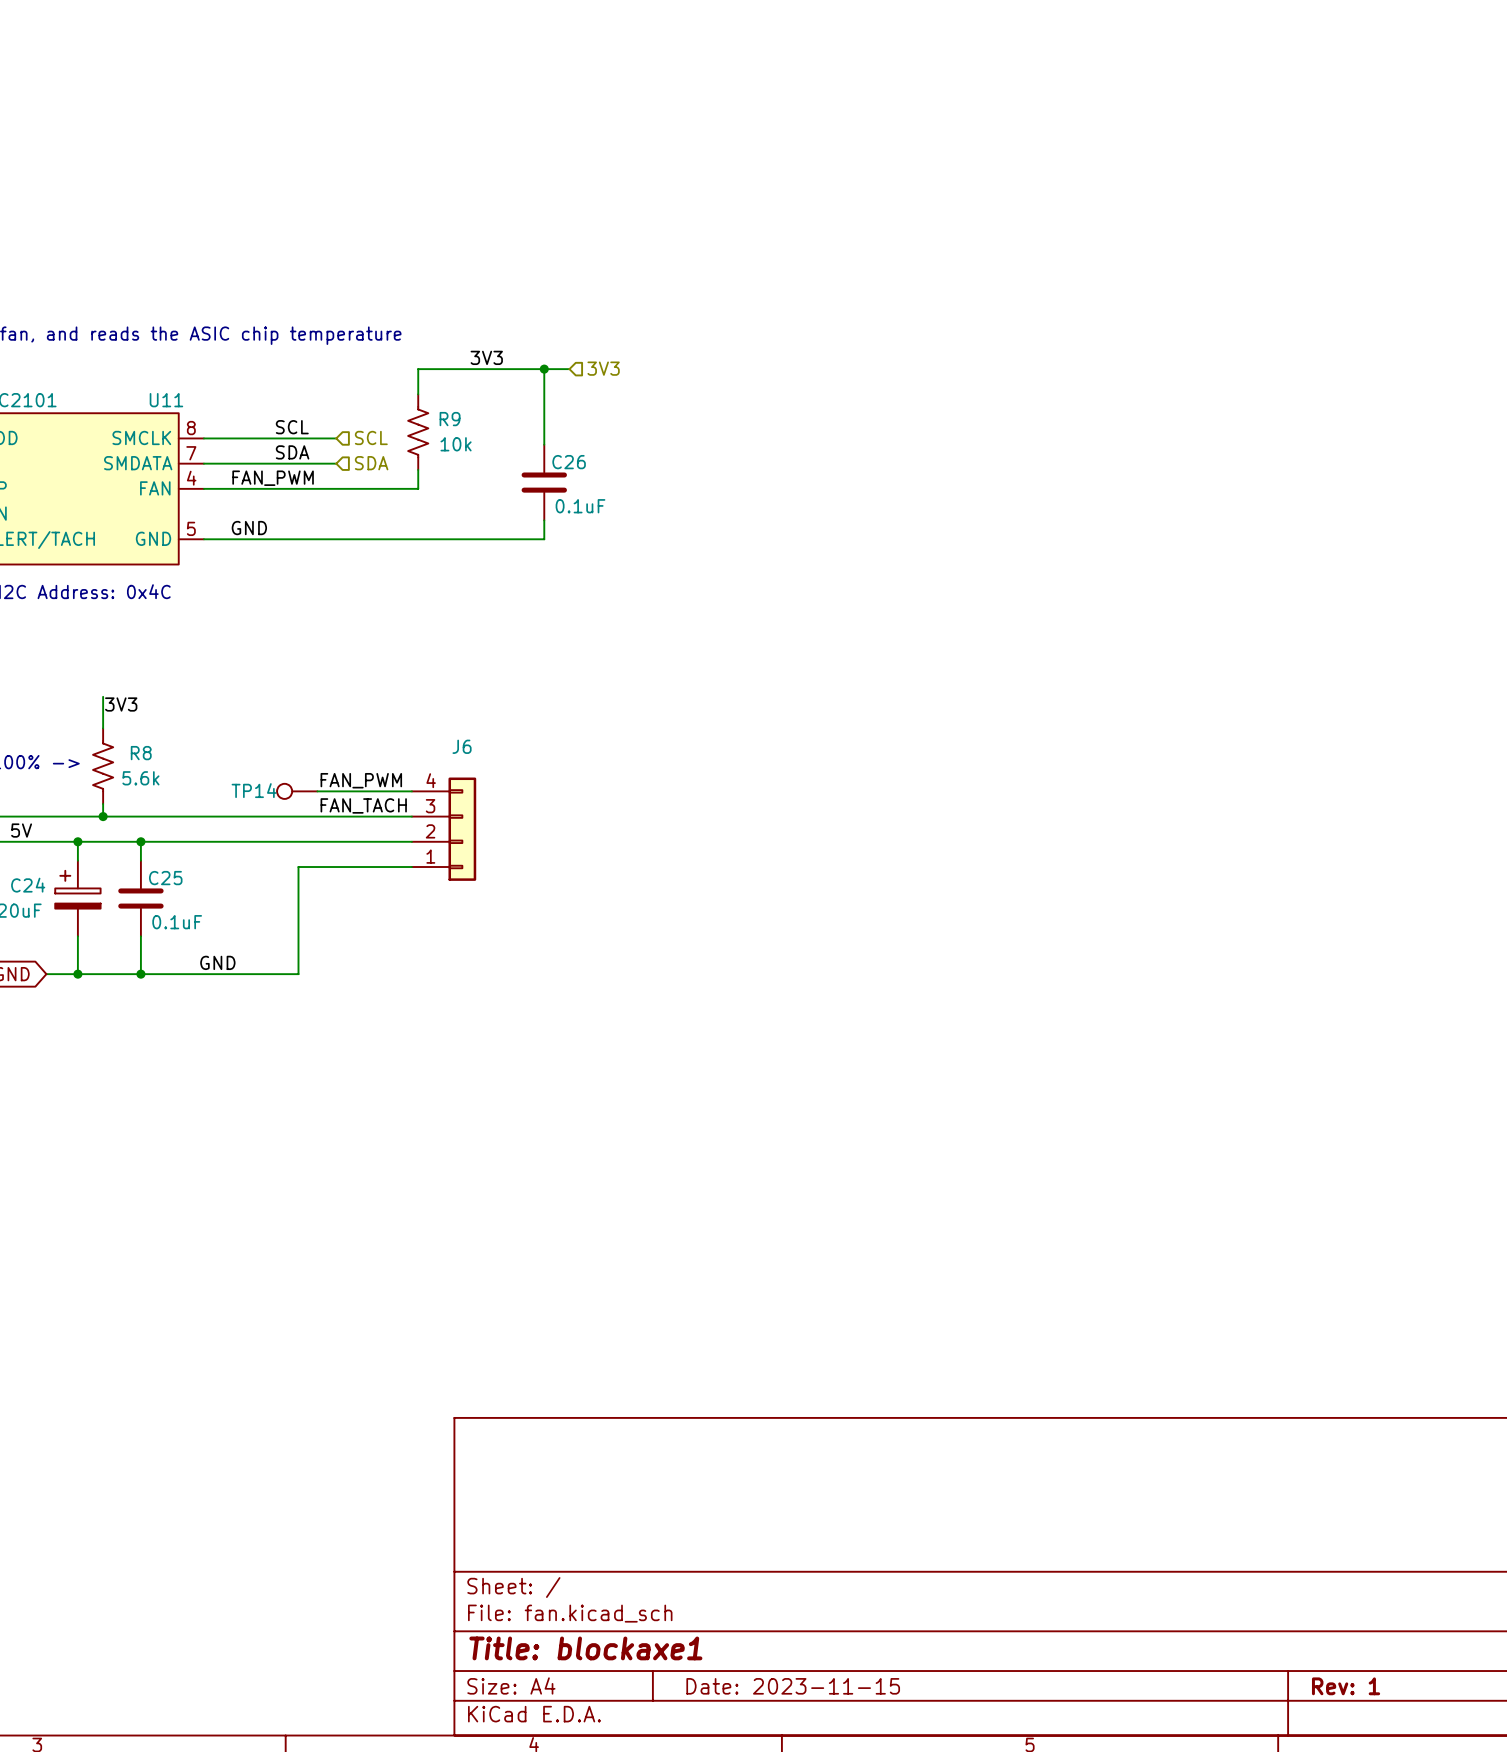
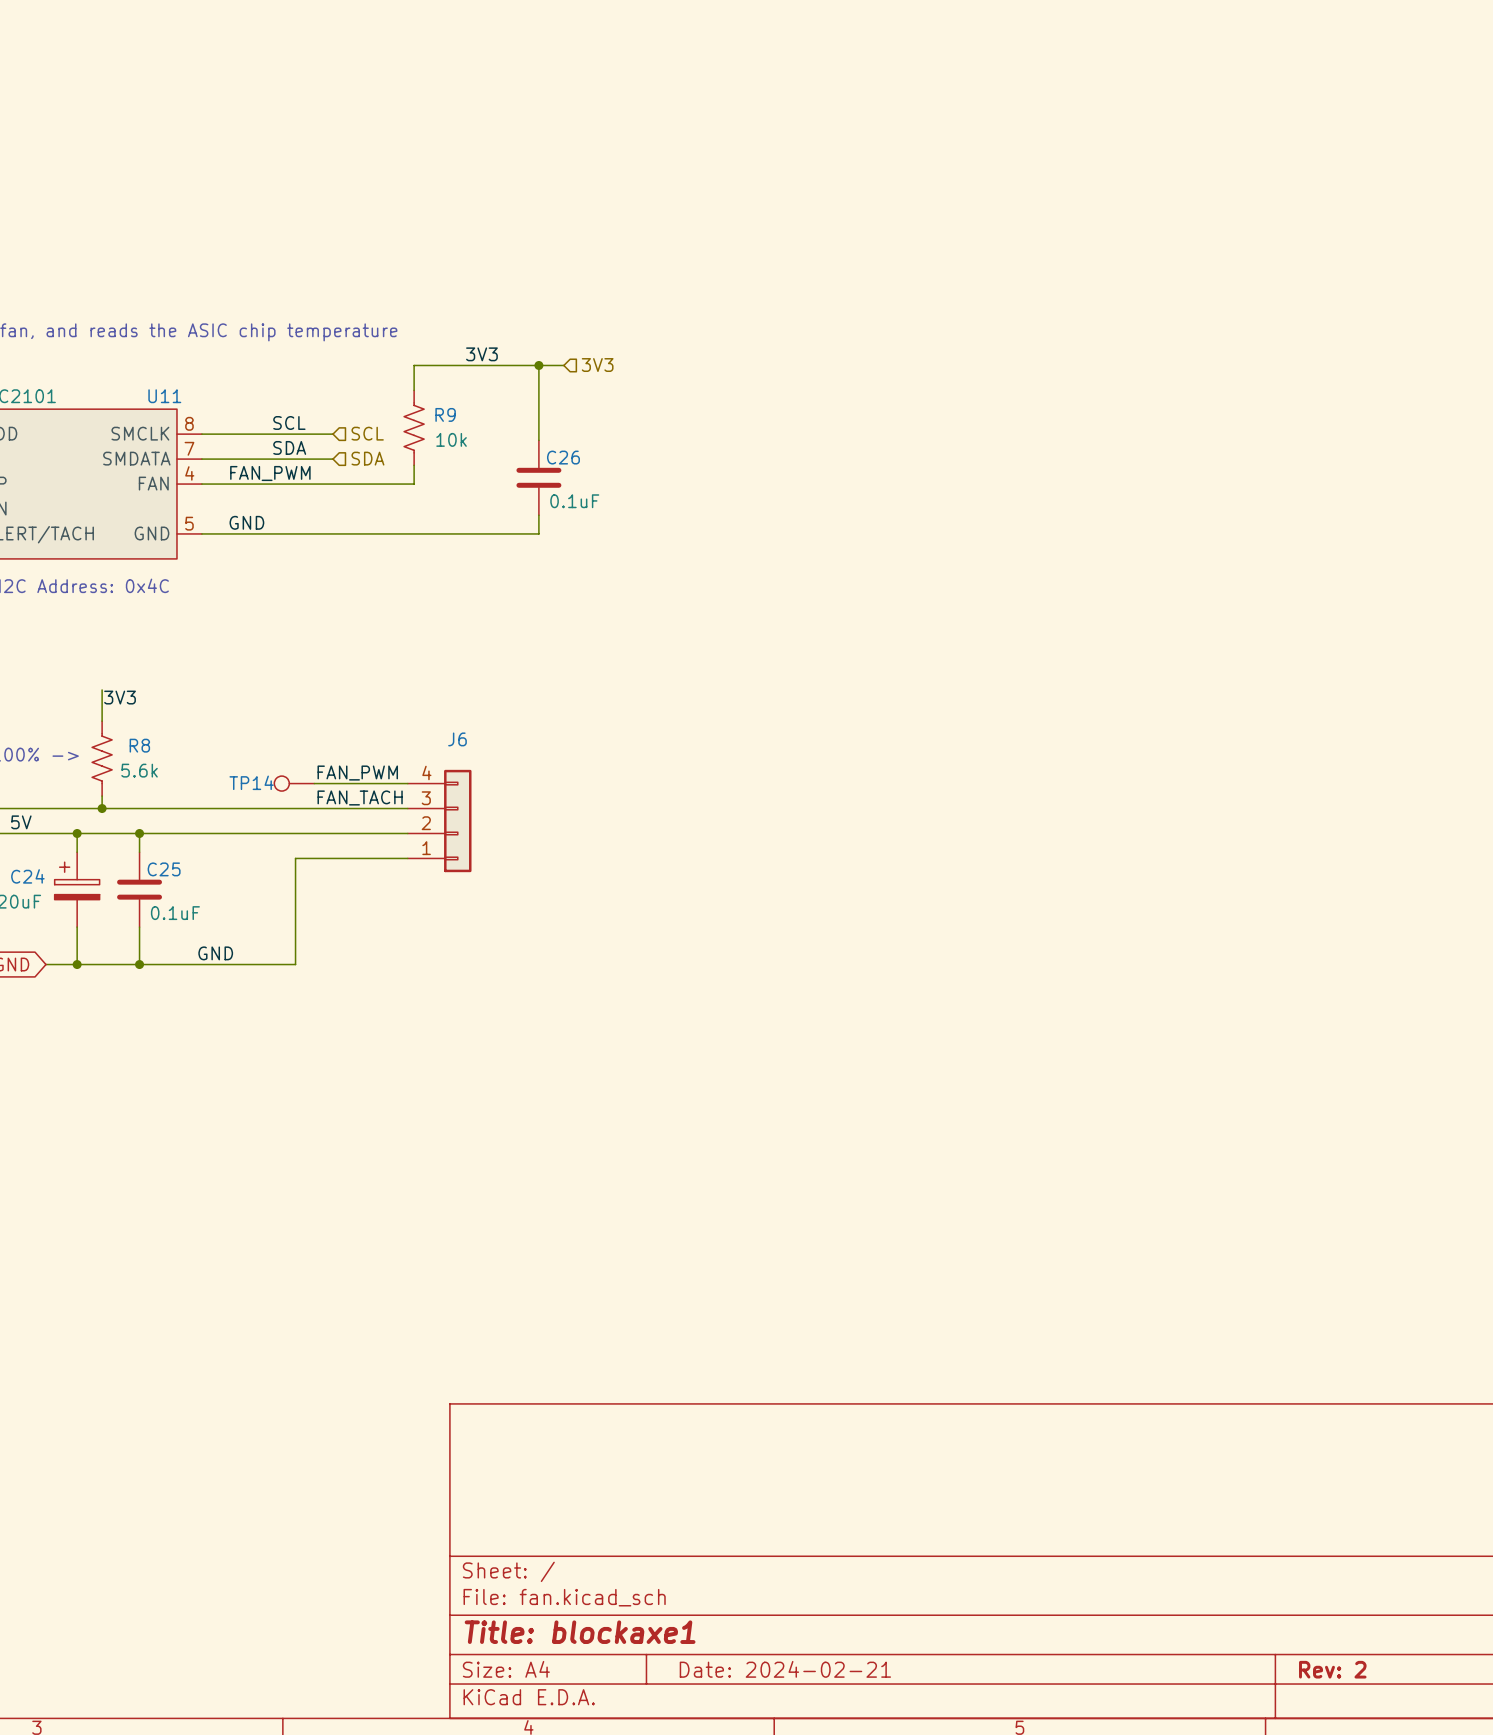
title block: Date: 2023-11-15 (793, 1686) -> Date: 2024-02-21 (785, 1669)
title block: Rev: 1 (1346, 1686) -> Rev: 2 (1332, 1669)

